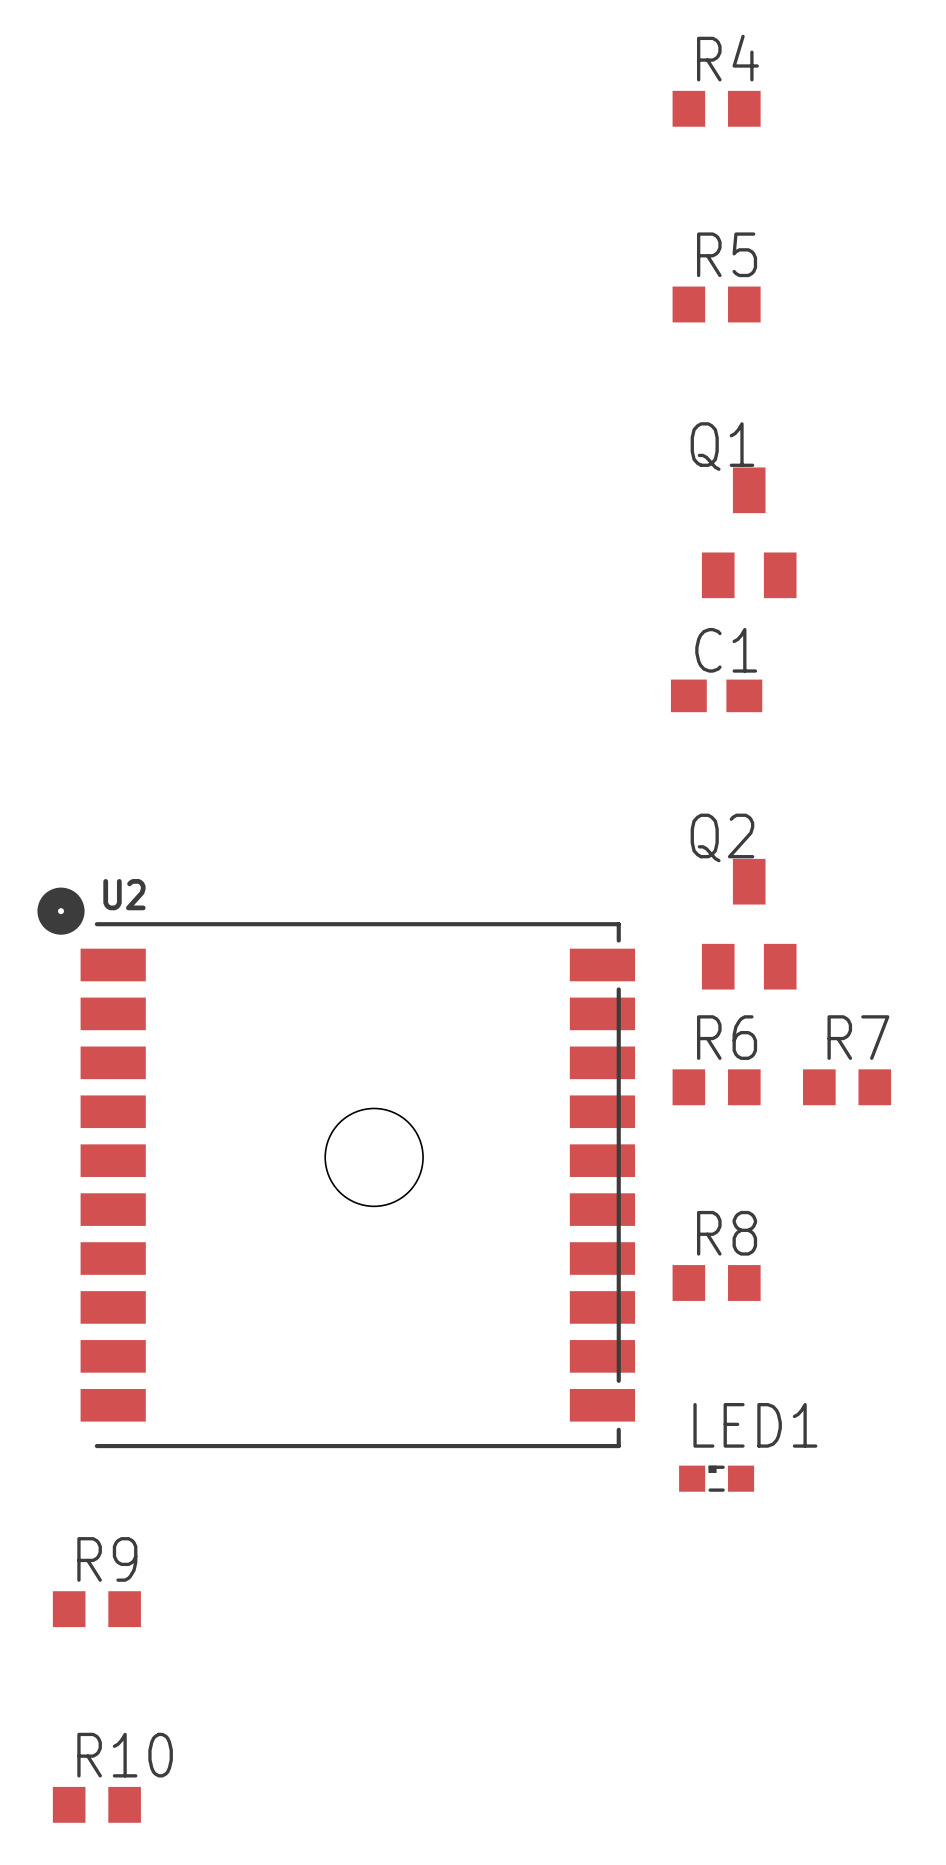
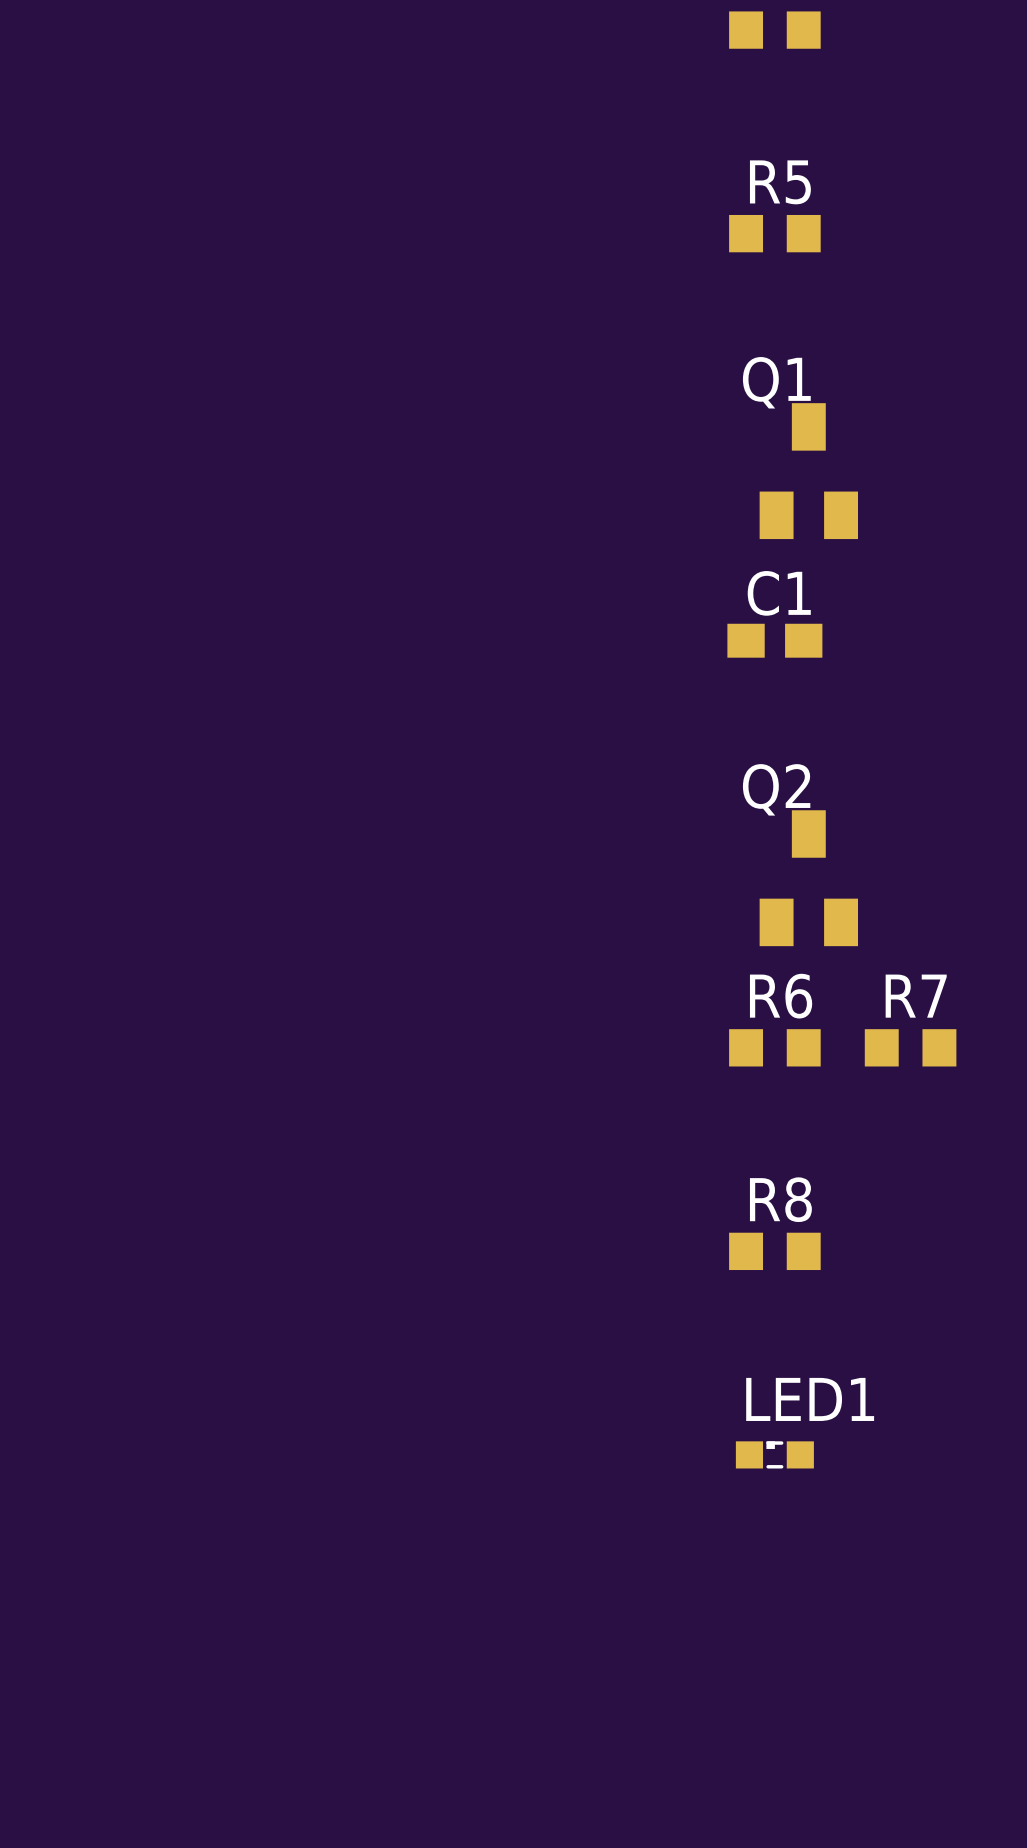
U2: (336, 1167) -> none
R9: (96, 1609) -> none
R10: (96, 1804) -> none

